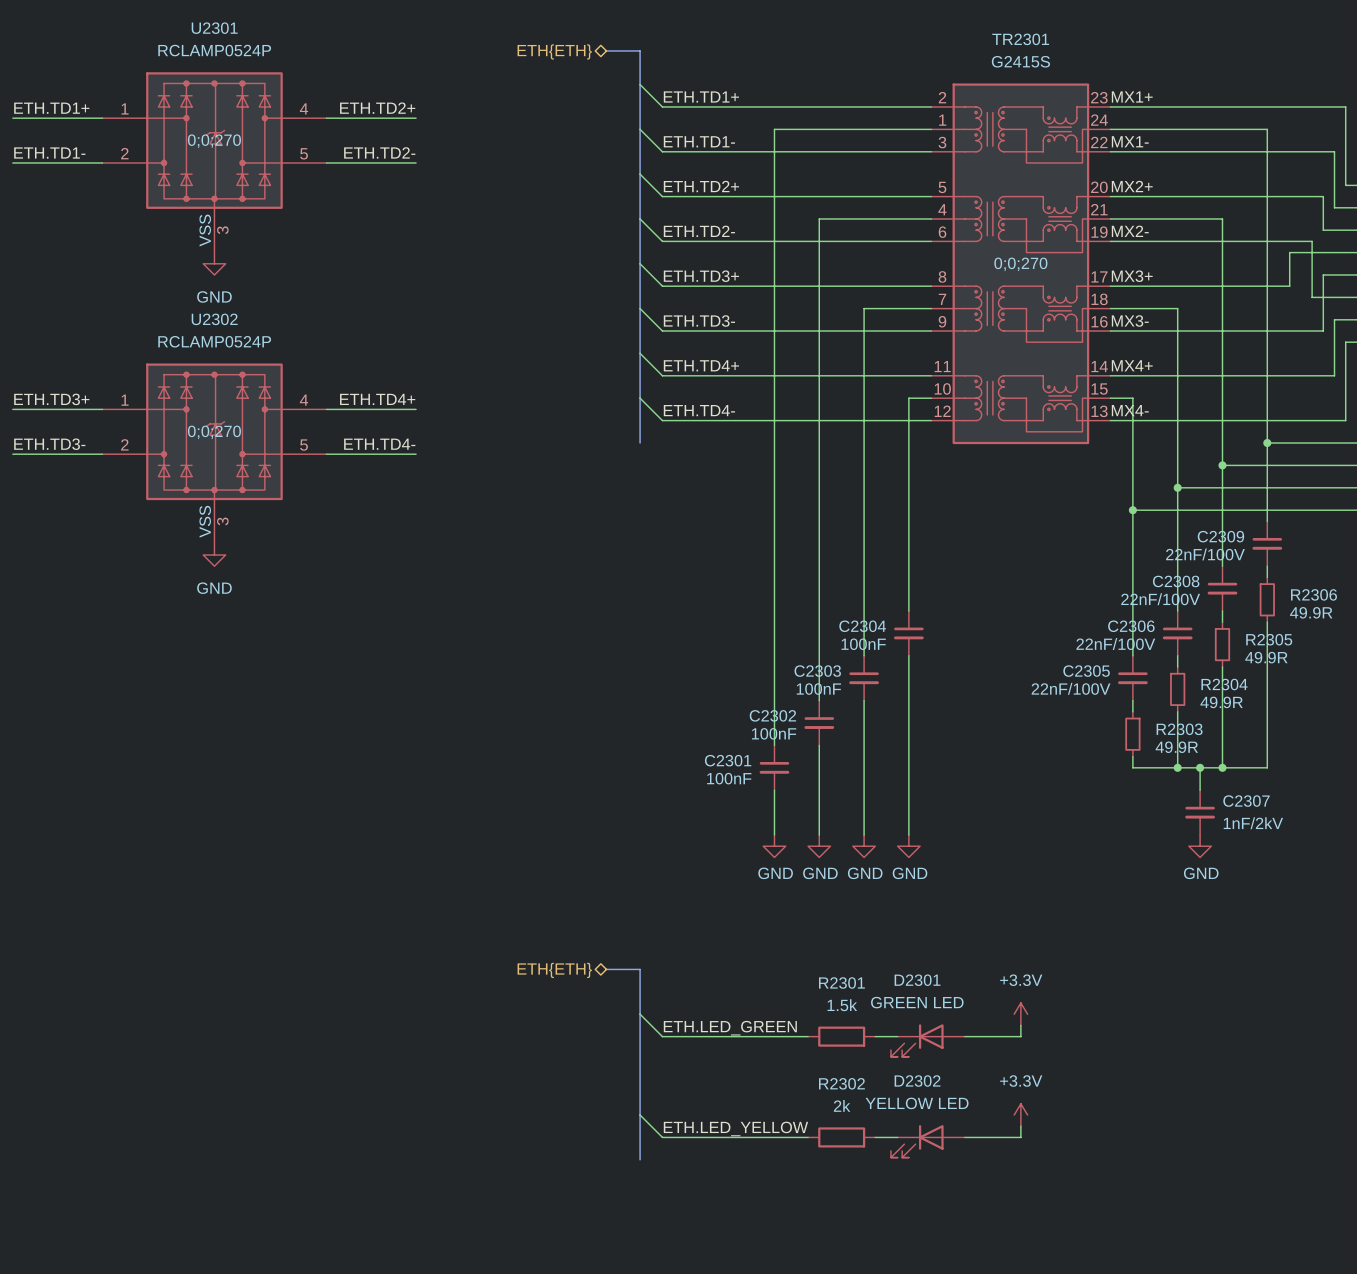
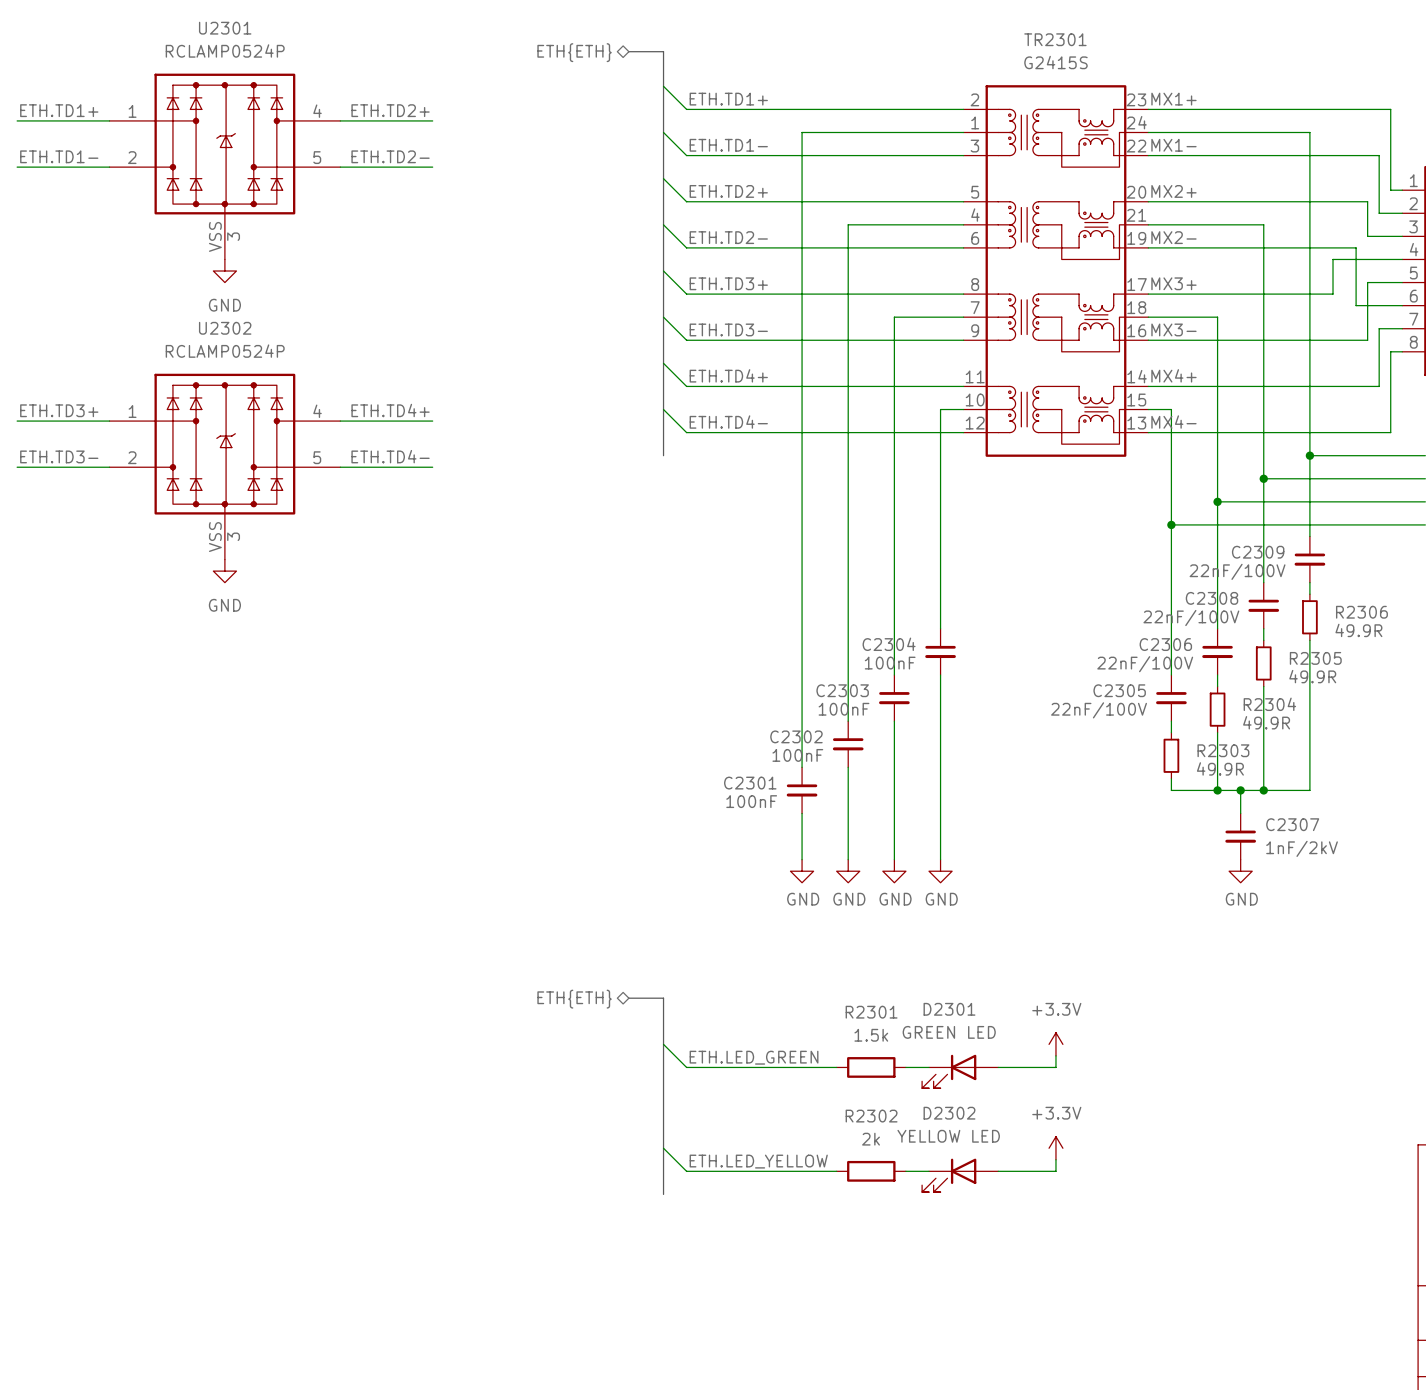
U2301 text: 0;0;270 (214, 141) -> none
TR2301 text: 0;0;270 (1020, 264) -> none
U2302 text: 0;0;270 (214, 432) -> none

